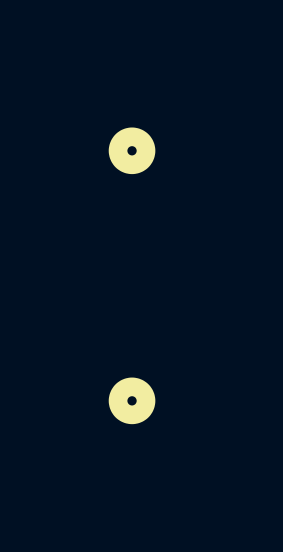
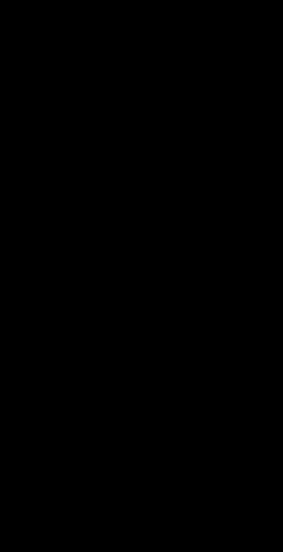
part: (132, 150) -> none
part: (132, 400) -> none

